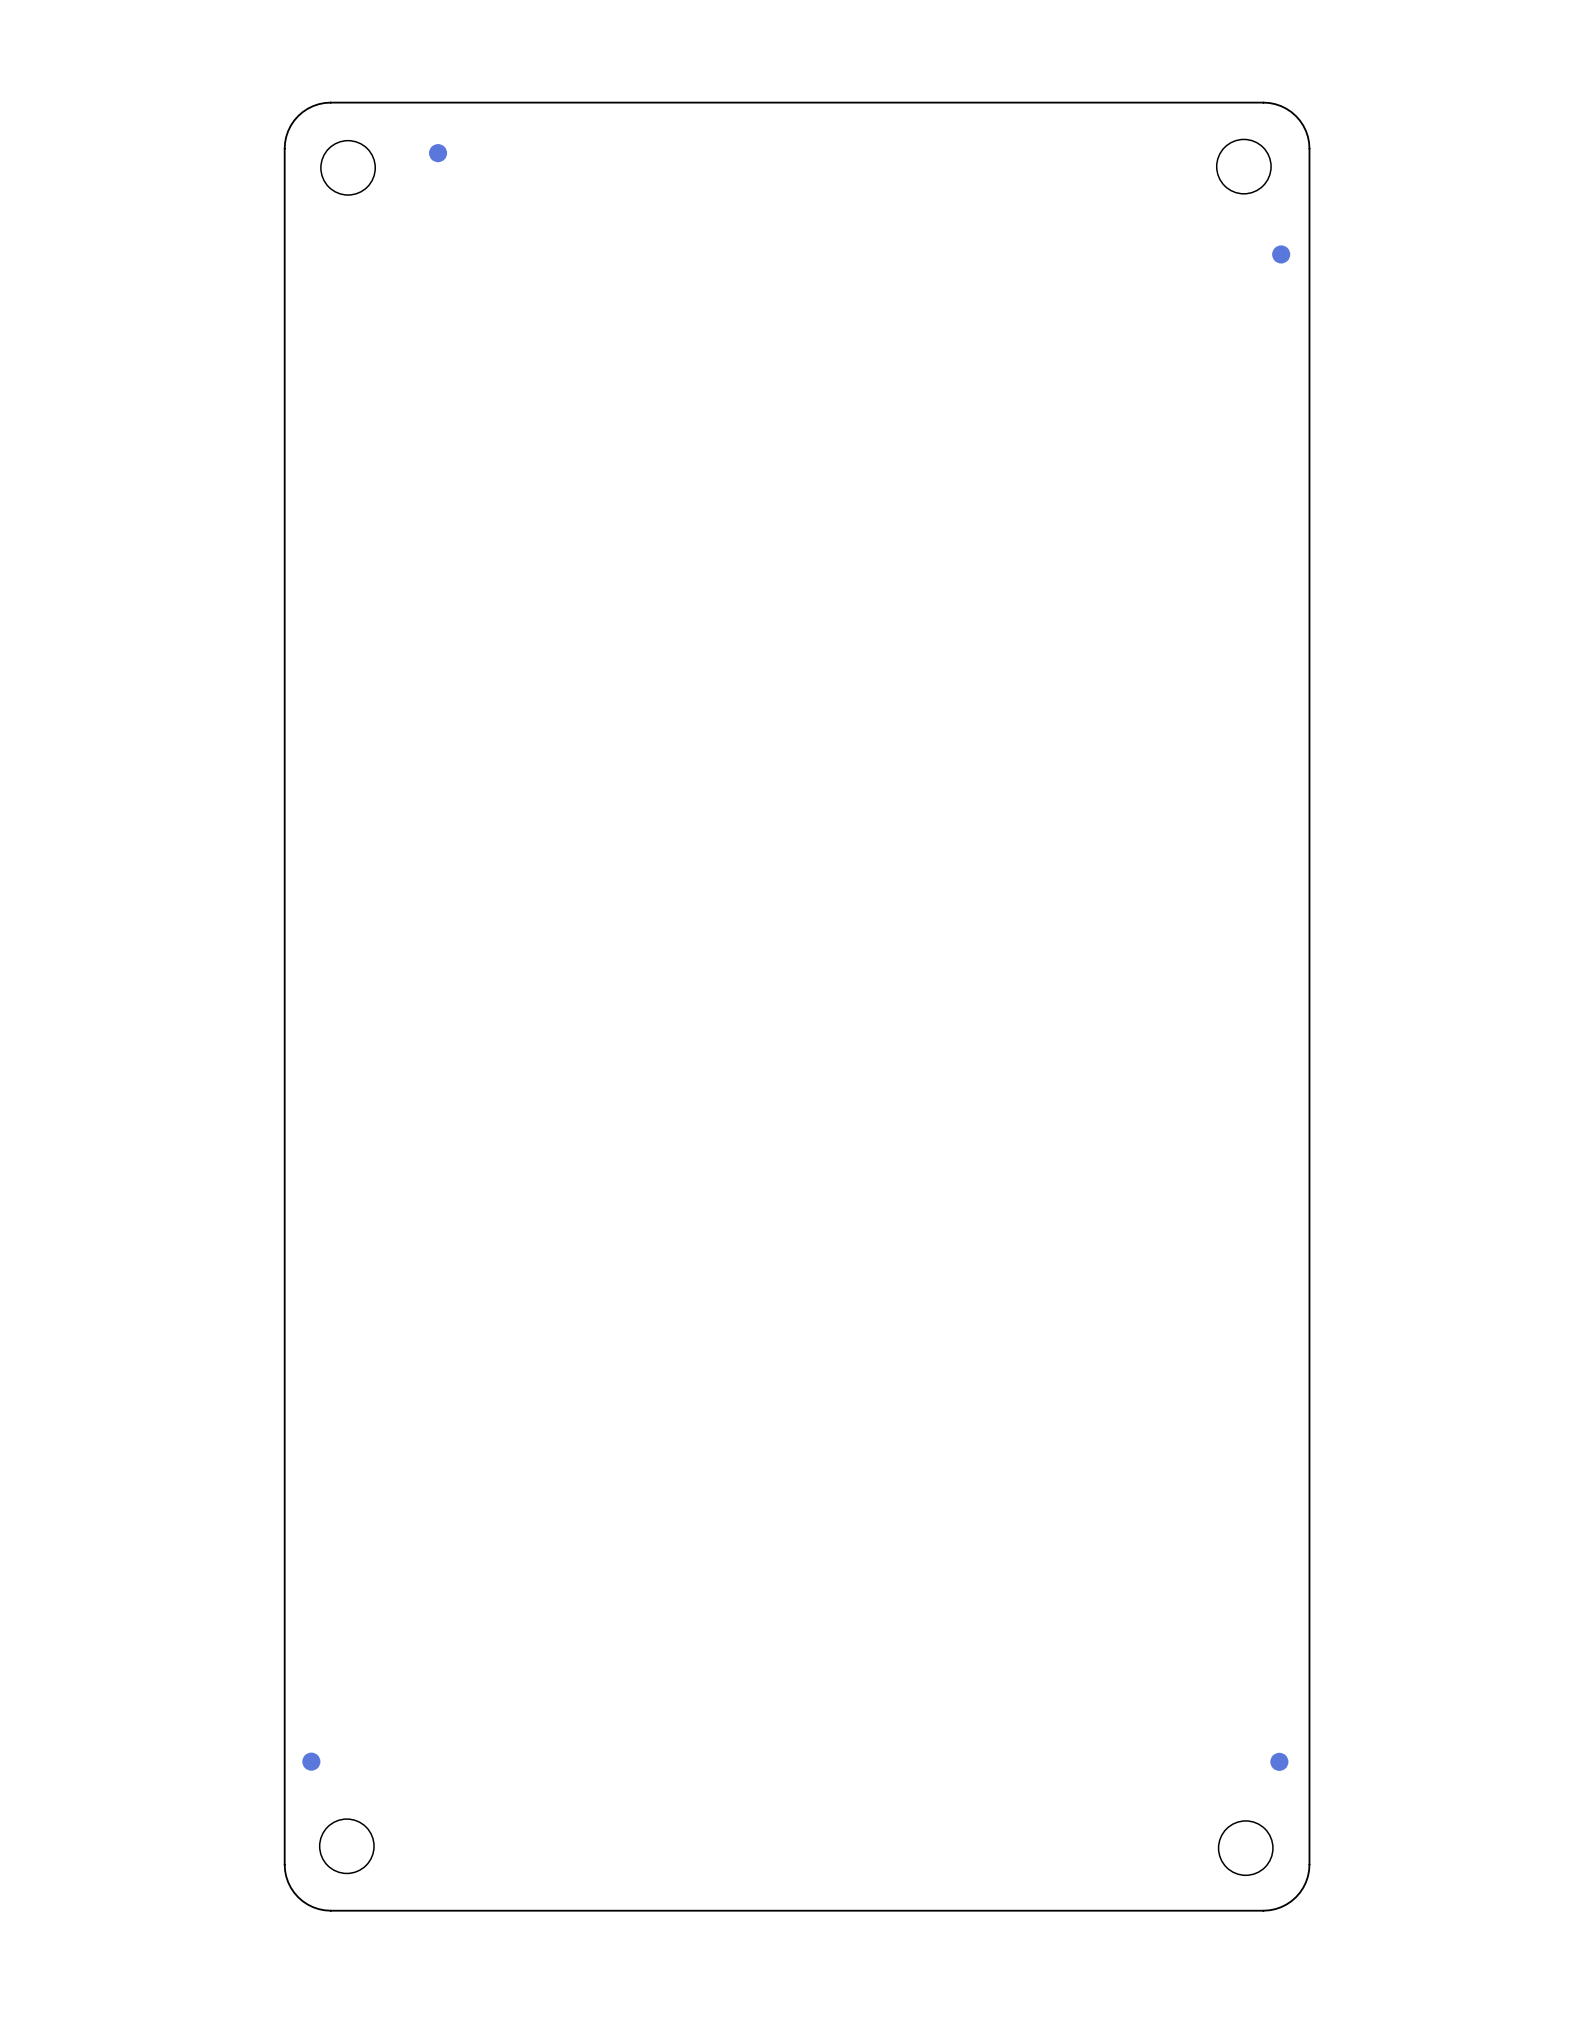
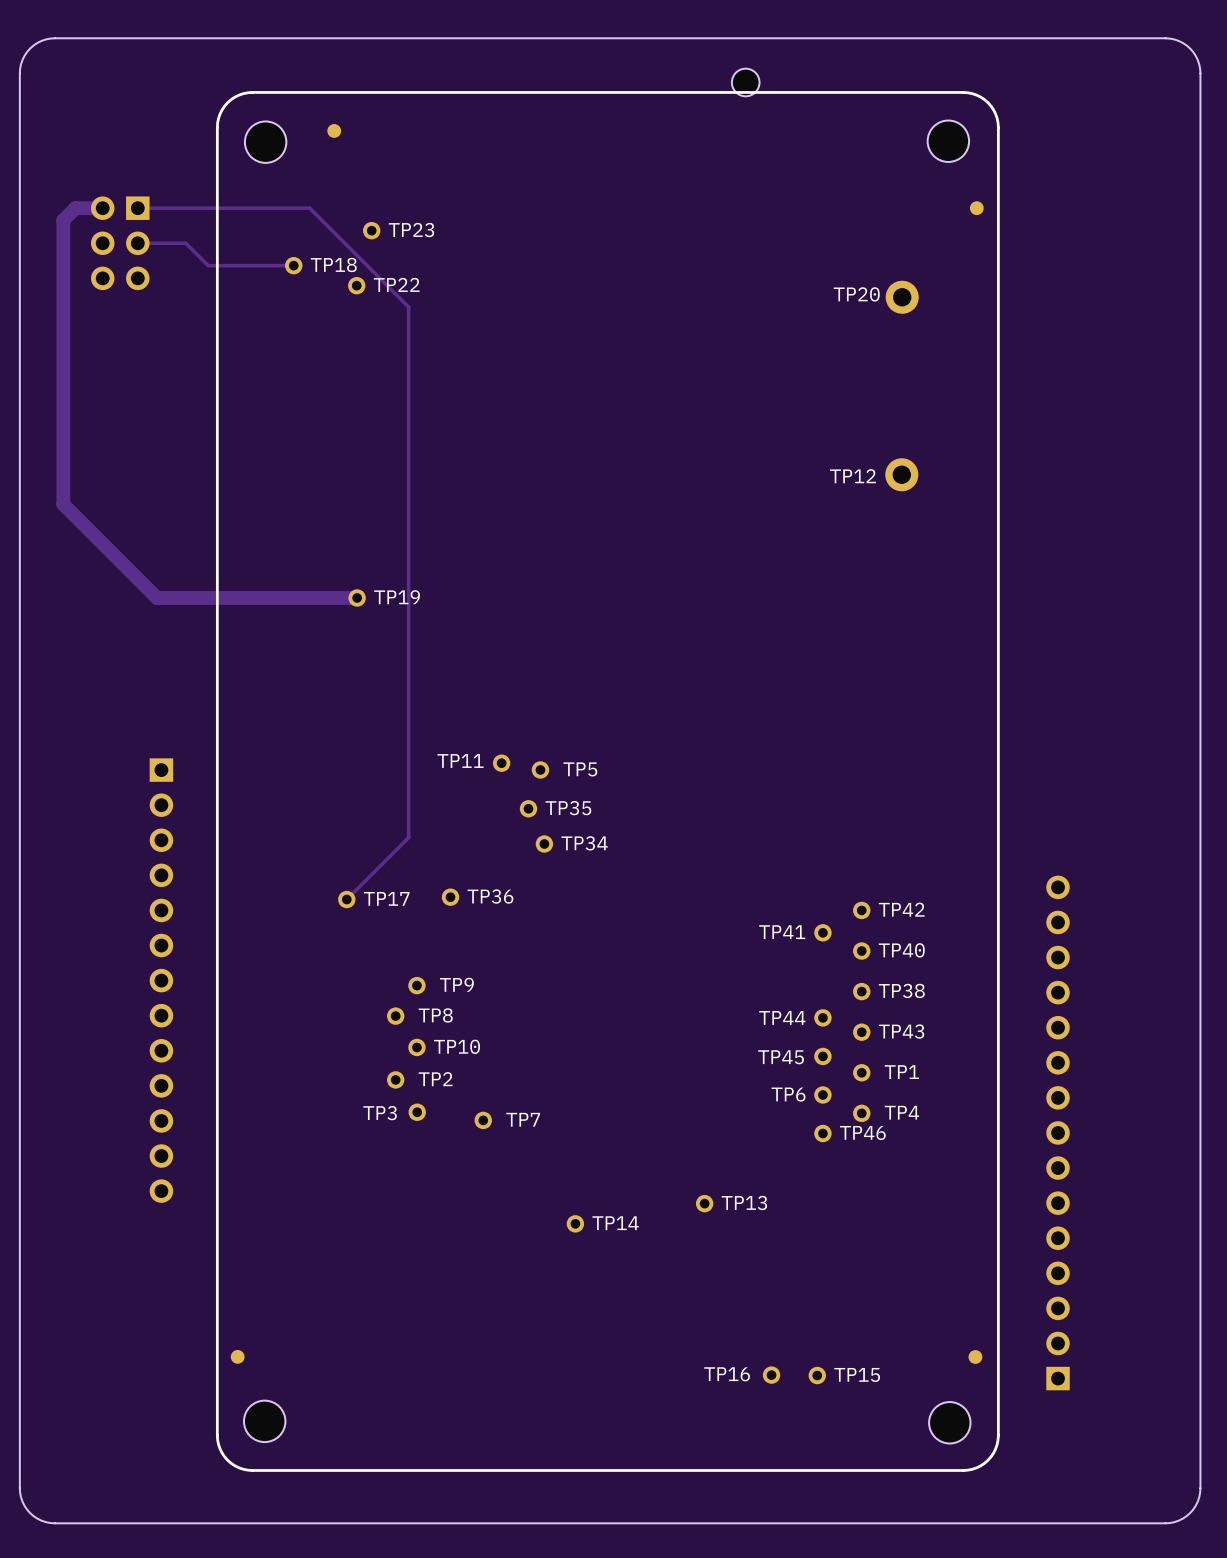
part: none -> (745, 82)
board edge: (1263, 102) (330, 102) (318, 104) (307, 108) (298, 116) (290, 125) (286, 136) (284, 148) (284, 1864) (286, 1876) (290, 1887) (298, 1897) (307, 1904) (318, 1909) (330, 1910) (1263, 1910) (1275, 1909) (1286, 1904) (1295, 1897) (1303, 1887) (1307, 1876) (1309, 1864) (1309, 148) (1305, 131) (1295, 116) (1281, 106) (1263, 102) -> (1165, 38) (1178, 40) (1190, 48) (1197, 59) (1200, 73) (1200, 1488) (1197, 1501) (1193, 1509) (1182, 1518) (1165, 1523) (54, 1523) (41, 1520) (33, 1516) (22, 1501) (19, 1488) (19, 73) (21, 64) (27, 52) (37, 42) (54, 38) (1165, 38)
line: none -> (963, 92) (252, 92) (234, 97) (222, 110) (217, 127) (217, 1435) (222, 1452) (234, 1465) (252, 1470) (963, 1470) (980, 1465) (993, 1452) (998, 1435) (998, 127) (995, 114) (988, 102) (976, 95) (963, 92)
track: none -> (102, 208) (75, 208) (63, 220) (63, 504) (157, 597) (357, 597)
track: none -> (137, 208) (309, 208) (408, 307) (408, 837) (346, 899)
TP23: none -> (371, 230)
part: none -> (120, 243)
track: none -> (137, 243) (185, 243) (208, 265) (293, 265)
TP18: none -> (293, 265)
TP22: none -> (356, 285)
TP20: none -> (902, 297)
TP12: none -> (901, 474)
TP19: none -> (357, 597)
TP11: none -> (501, 763)
TP5: none -> (540, 769)
TP35: none -> (528, 808)
TP34: none -> (544, 844)
TP36: none -> (450, 897)
TP17: none -> (346, 899)
TP42: none -> (861, 910)
TP41: none -> (822, 932)
TP40: none -> (861, 951)
part: none -> (161, 980)
TP9: none -> (416, 985)
TP38: none -> (861, 991)
TP8: none -> (395, 1016)
TP44: none -> (822, 1017)
TP43: none -> (861, 1032)
TP10: none -> (416, 1047)
TP45: none -> (822, 1056)
TP1: none -> (861, 1072)
TP2: none -> (395, 1079)
TP6: none -> (822, 1094)
TP3: none -> (417, 1112)
TP4: none -> (861, 1113)
TP7: none -> (483, 1120)
part: none -> (1058, 1132)
TP46: none -> (822, 1133)
TP13: none -> (704, 1203)
TP14: none -> (575, 1223)
TP16: none -> (771, 1375)
TP15: none -> (817, 1375)

